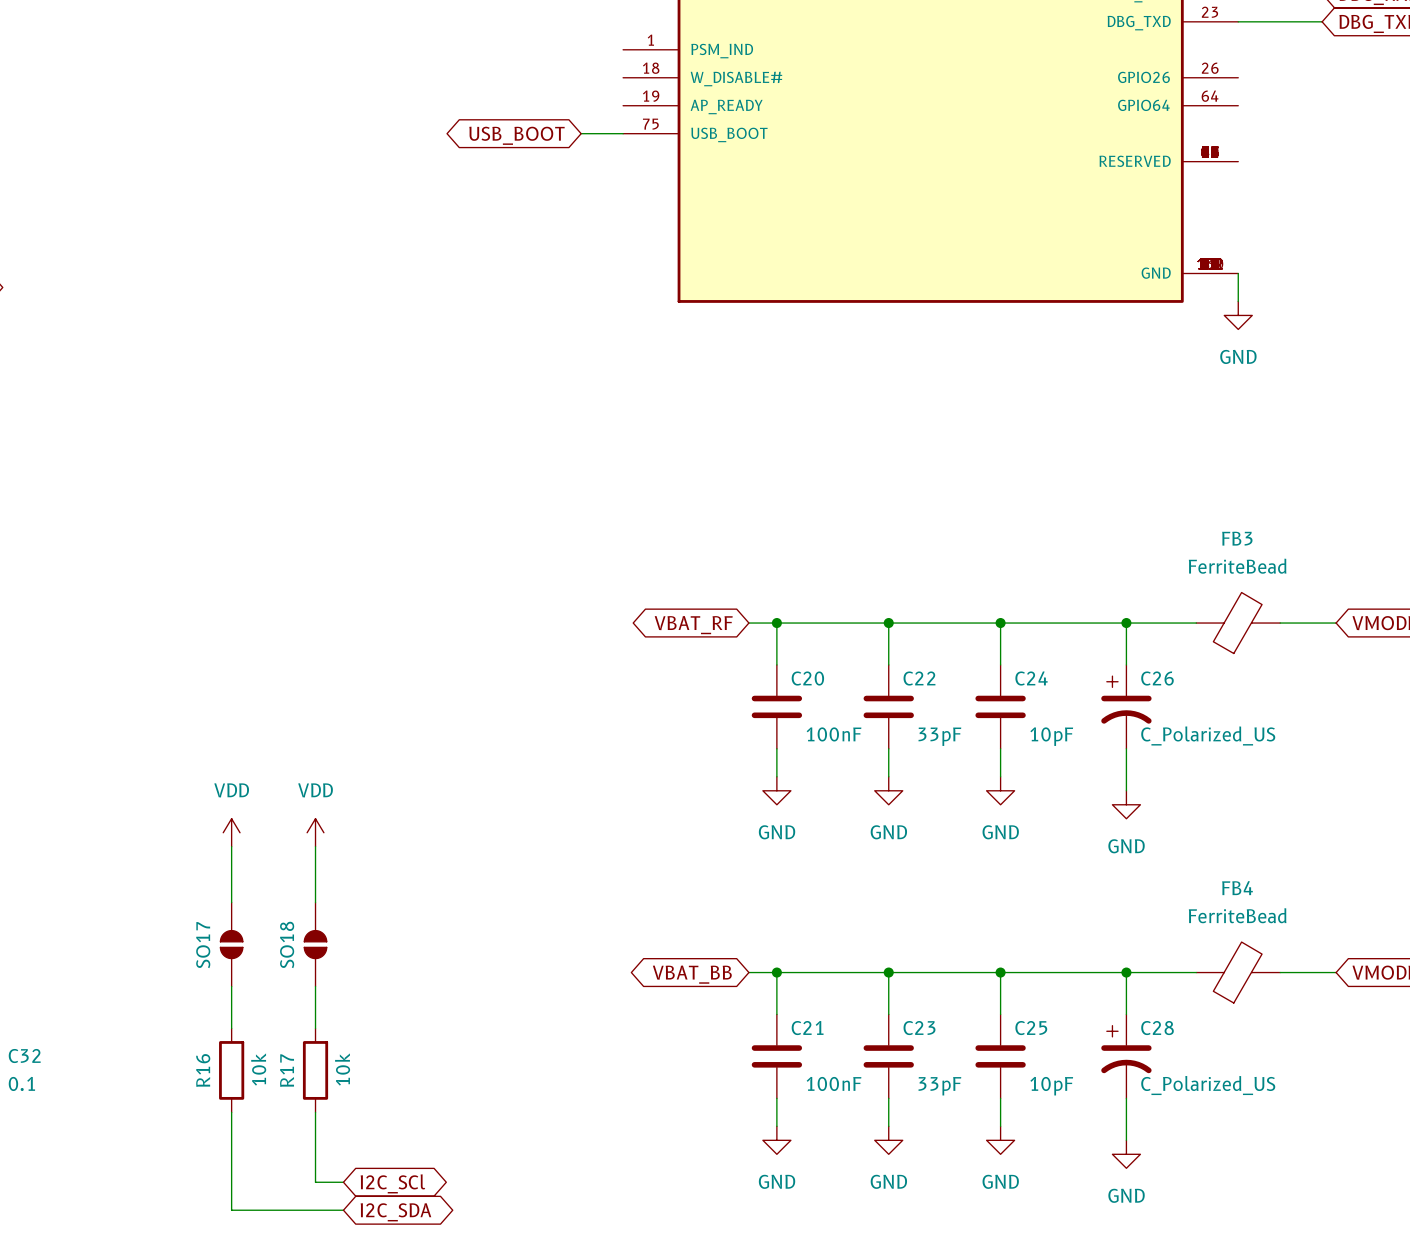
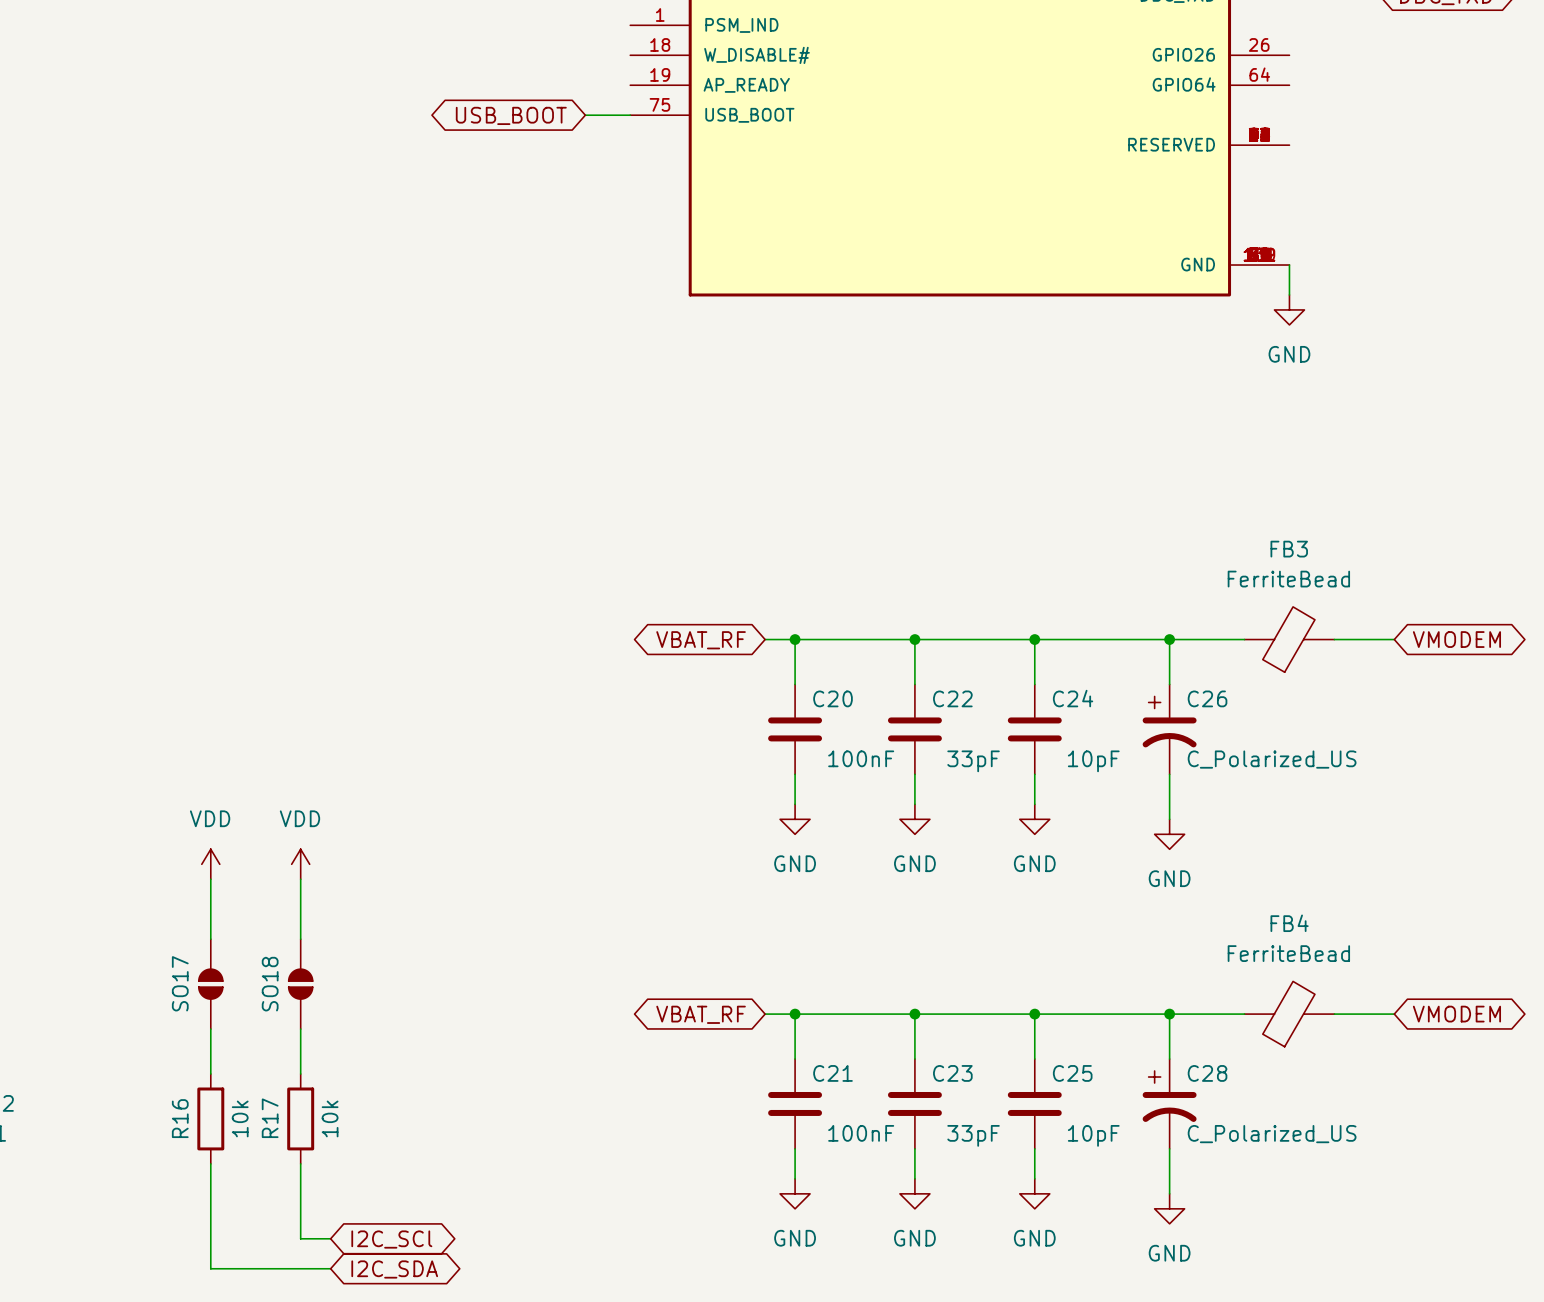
global label: VBAT_BB (692, 974) -> VBAT_RF (701, 1014)

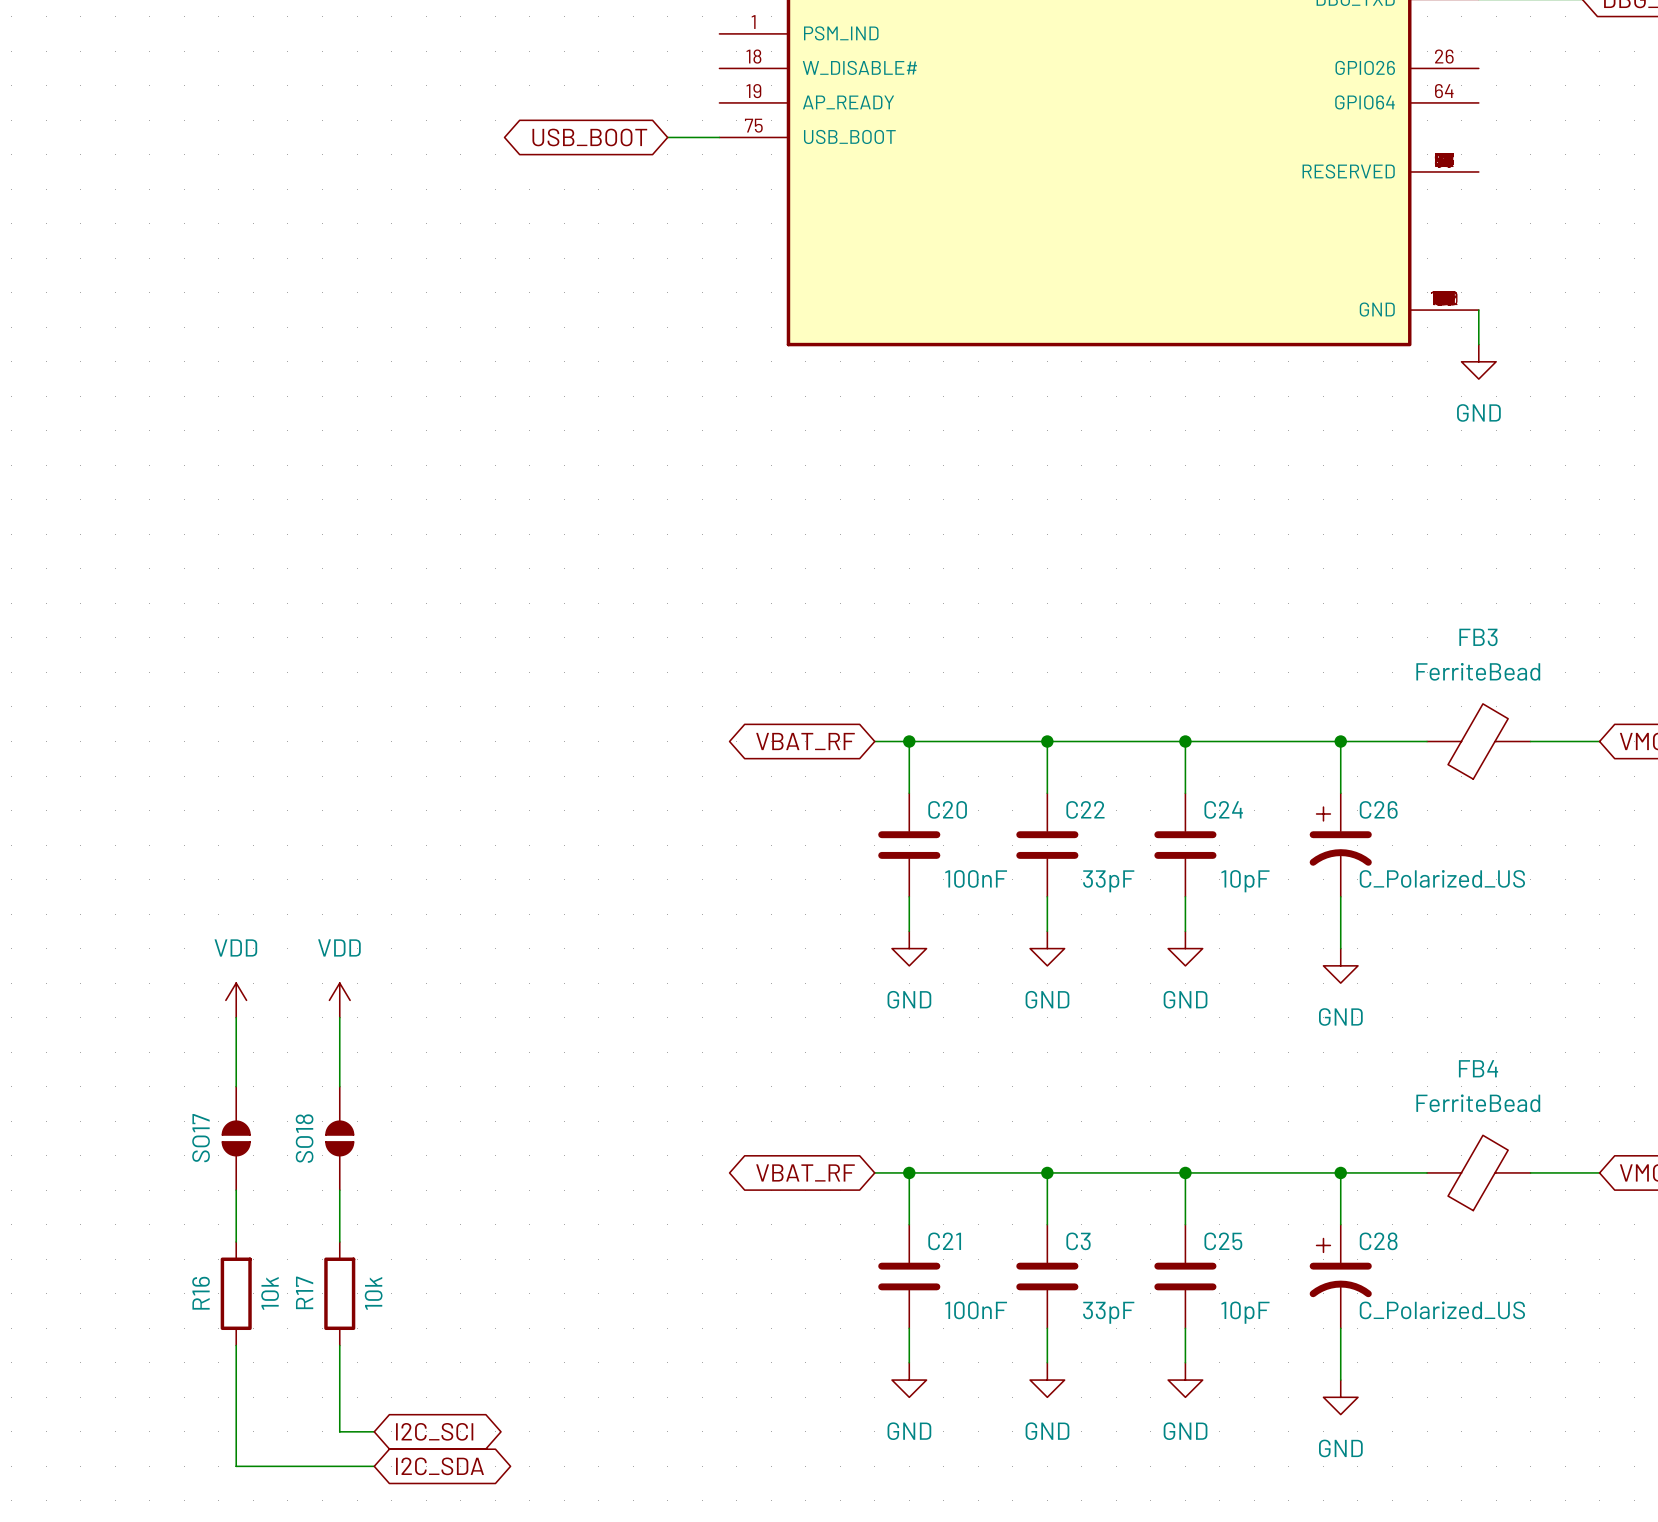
C23 name: C23 (952, 1073) -> C3 (1078, 1241)

